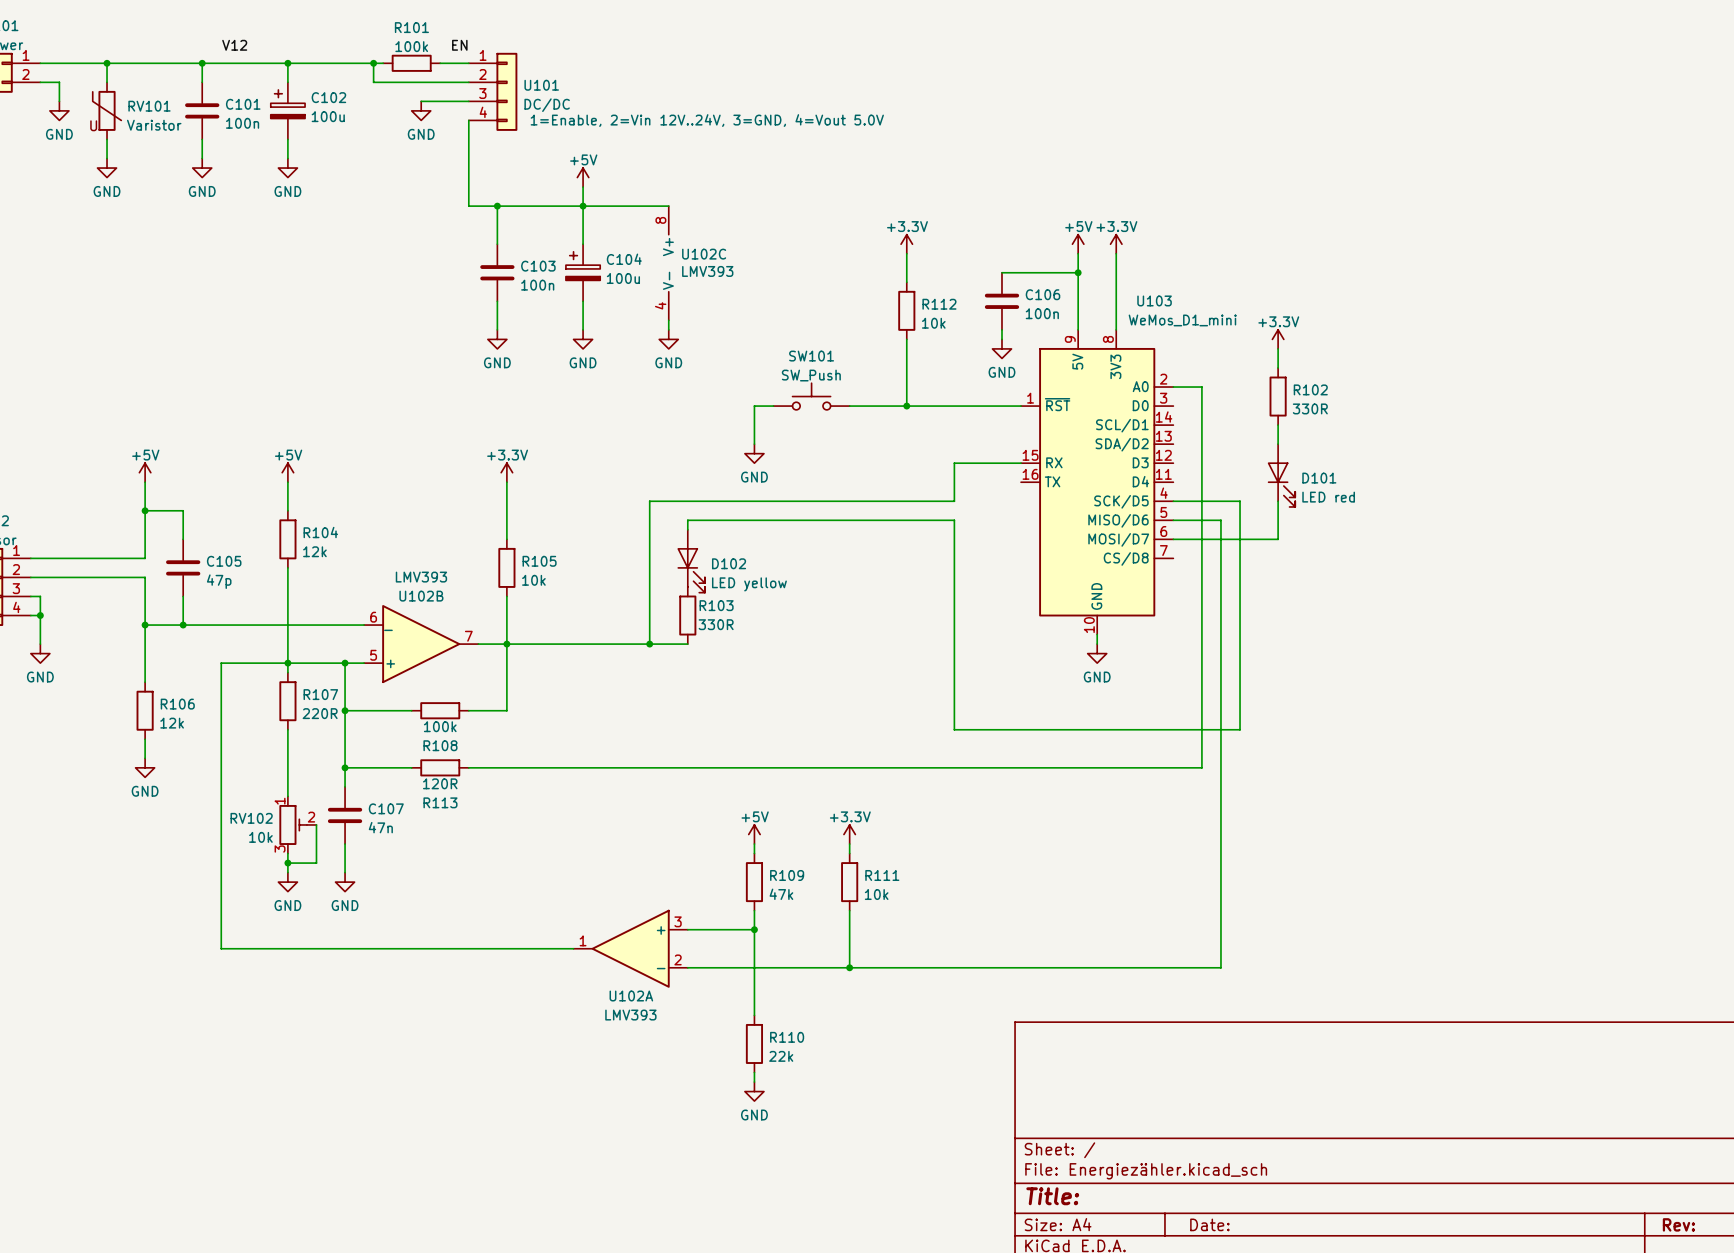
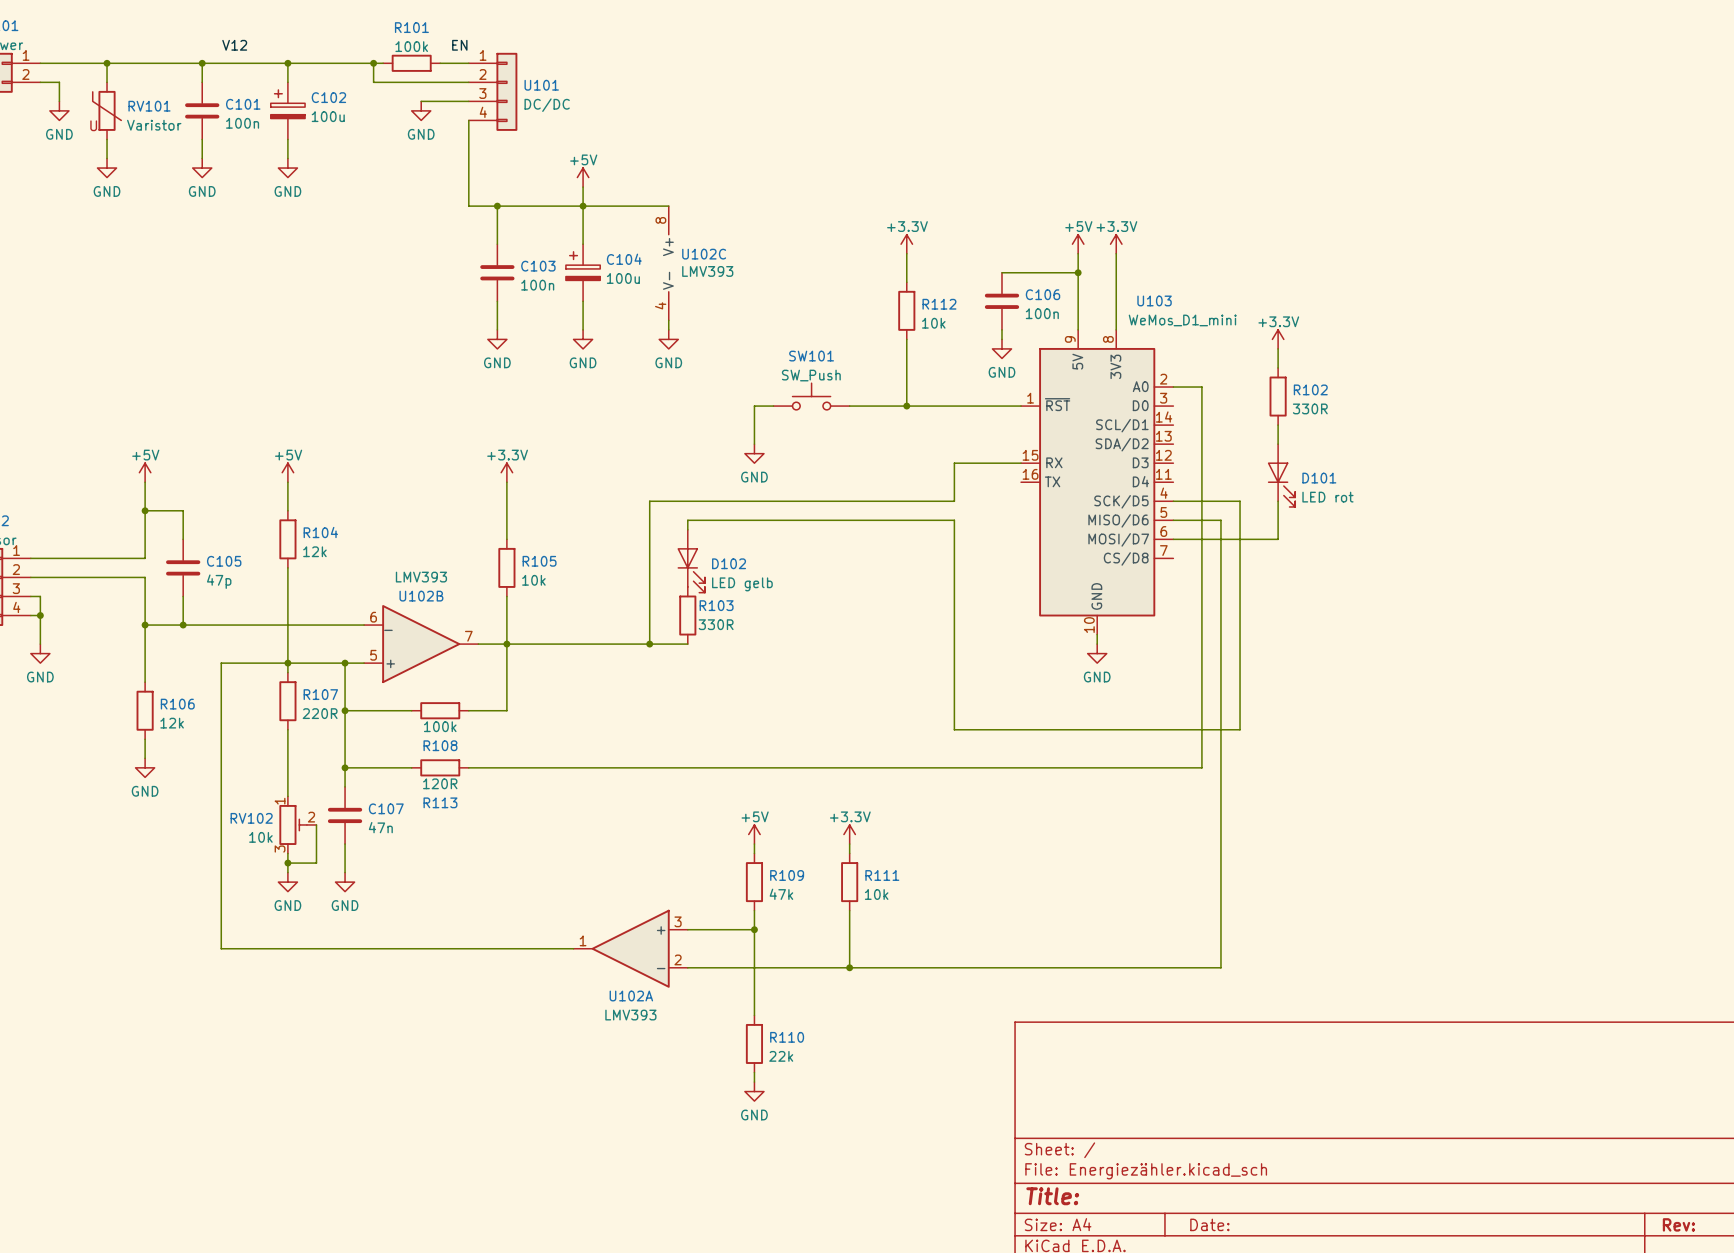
U101 text: 1=Enable, 2=Vin 12V..24V, 3=GND, 4=Vout 5.0V (707, 120) -> none
D101 value: LED red (1328, 497) -> LED rot (1327, 497)
D102 value: LED yellow (749, 584) -> LED gelb (742, 584)

